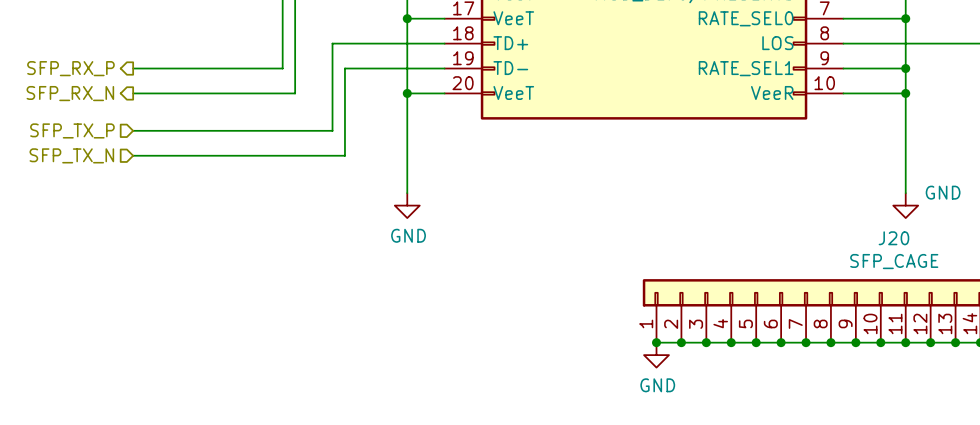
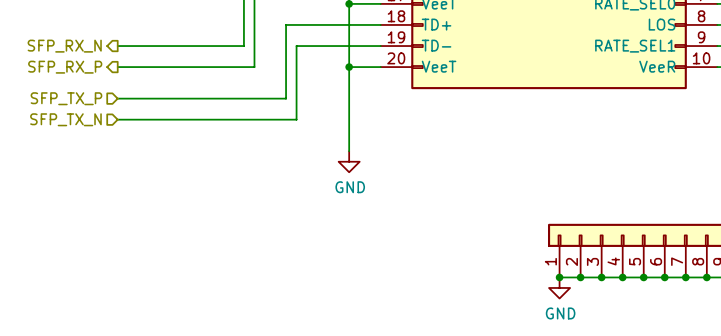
hierarchical label: SFP_RX_P (70, 68) -> SFP_RX_N (64, 46)
hierarchical label: SFP_RX_N (70, 93) -> SFP_RX_P (65, 67)

